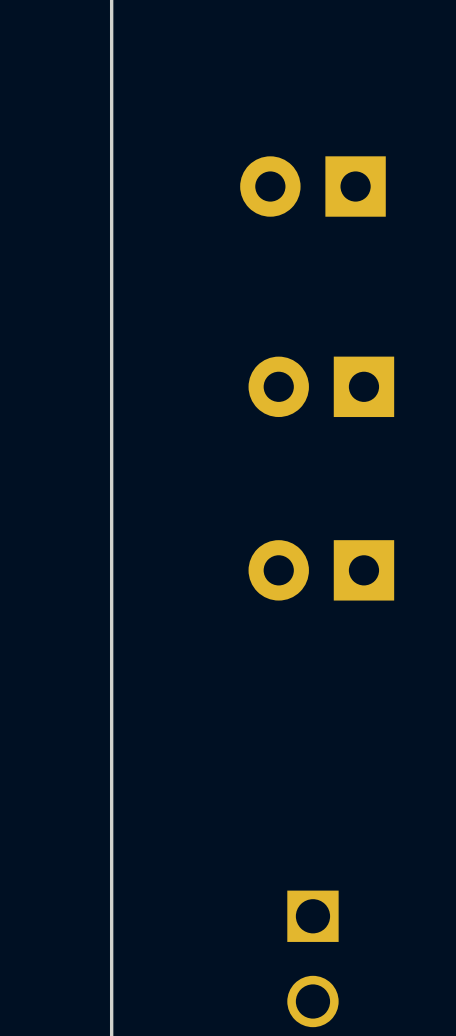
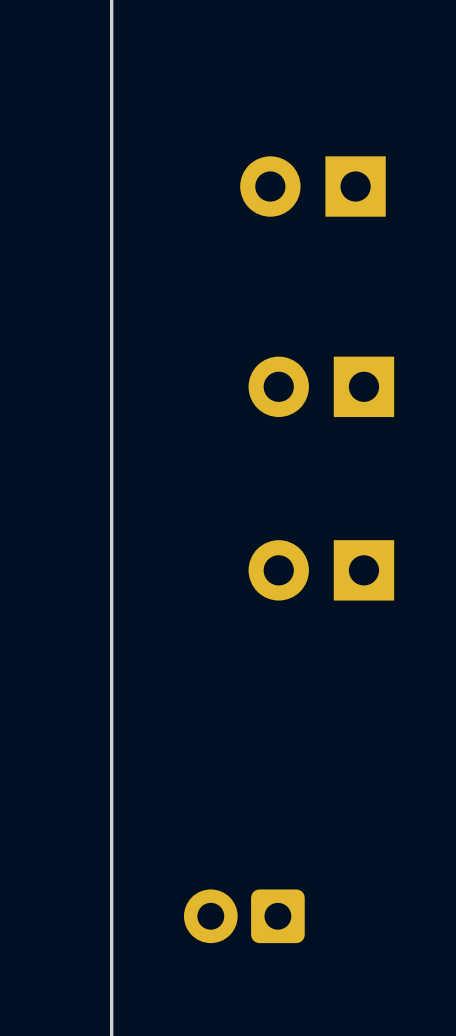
part: none -> (244, 916)
part: (312, 958) -> none

